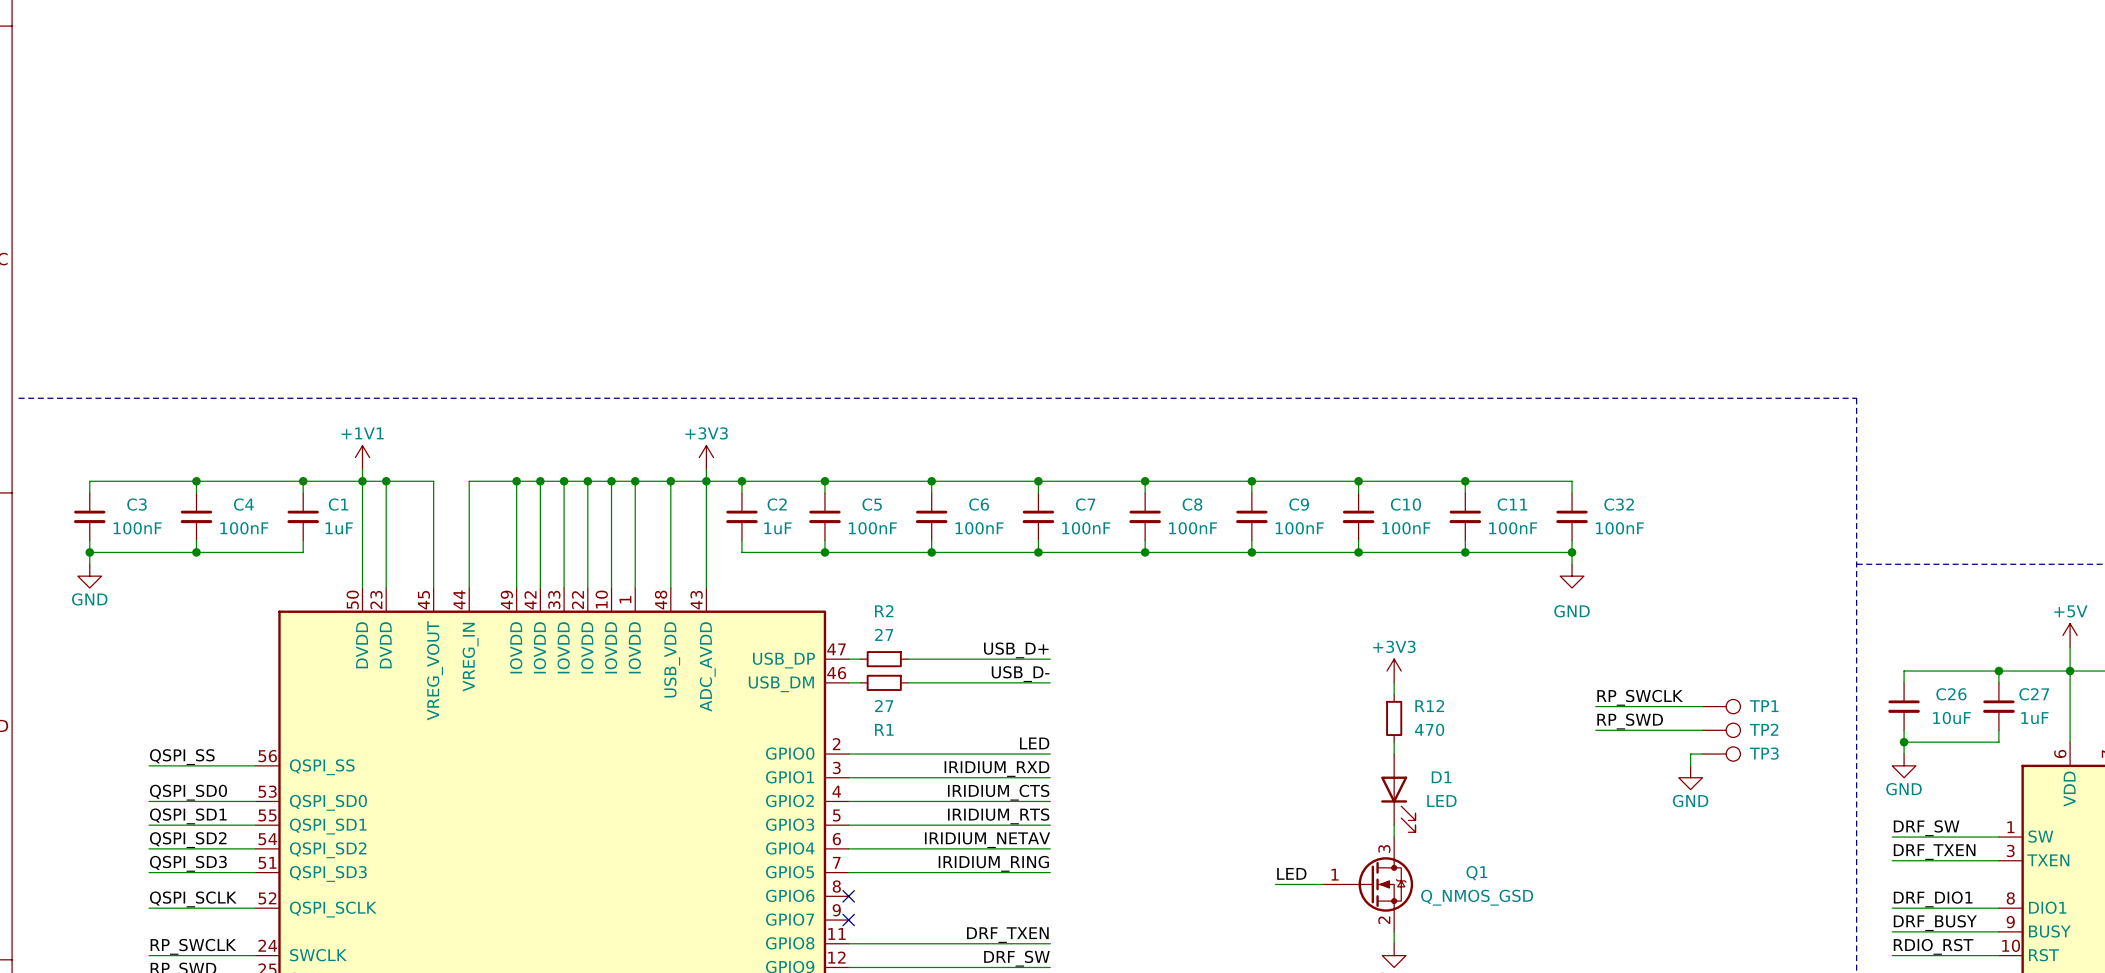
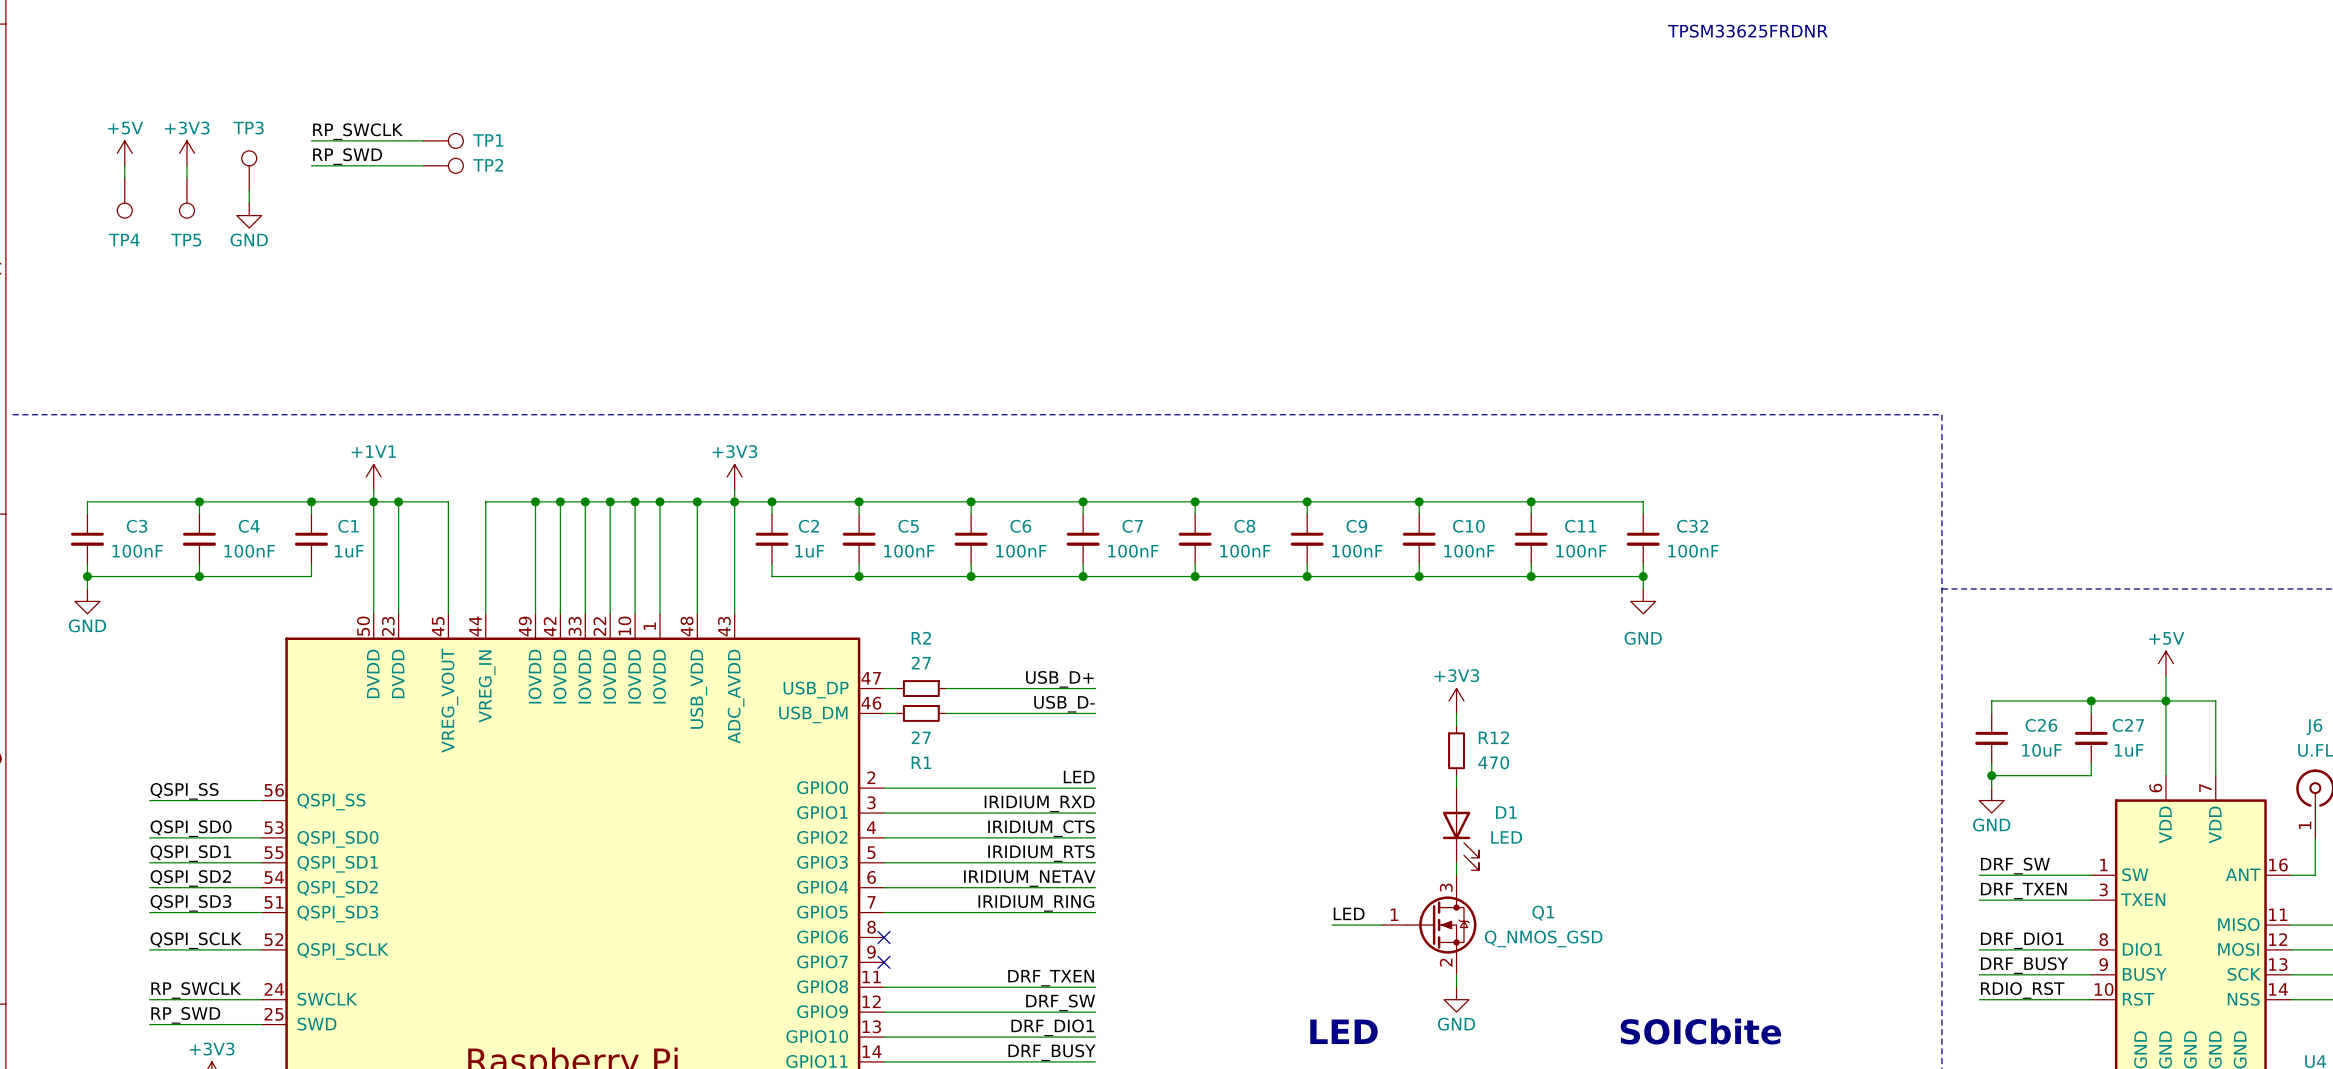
text: none -> TPSM33625FRDNR (1747, 31)
label: none -> RP_SWCLK (358, 131)
wire: none -> (311, 140) (423, 140)
power symbol: none -> +5V (124, 153)
power symbol: none -> +3V3 (187, 153)
label: none -> RP_SWD (347, 156)
wire: none -> (124, 165) (124, 178)
wire: none -> (187, 165) (187, 178)
wire: none -> (311, 165) (423, 165)
wire: none -> (249, 190) (249, 203)
TP4: none -> (124, 198)
TP5: none -> (187, 198)
power symbol: none -> GND (249, 215)
label: RP_SWCLK (1640, 697) -> none
wire: (1595, 706) (1702, 706) -> none
TP1 position: (1721, 706) -> (443, 140)
label: RP_SWD (1630, 721) -> none
wire: (1595, 730) (1702, 730) -> none
TP2 position: (1721, 730) -> (443, 165)
wire: (1702, 754) (1690, 754) (1690, 765) -> none
TP3 position: (1721, 754) -> (249, 170)
TP3 rotation: 0° (1733, 754) -> 90° counterclockwise (249, 158)
power symbol: GND (1690, 777) -> none

